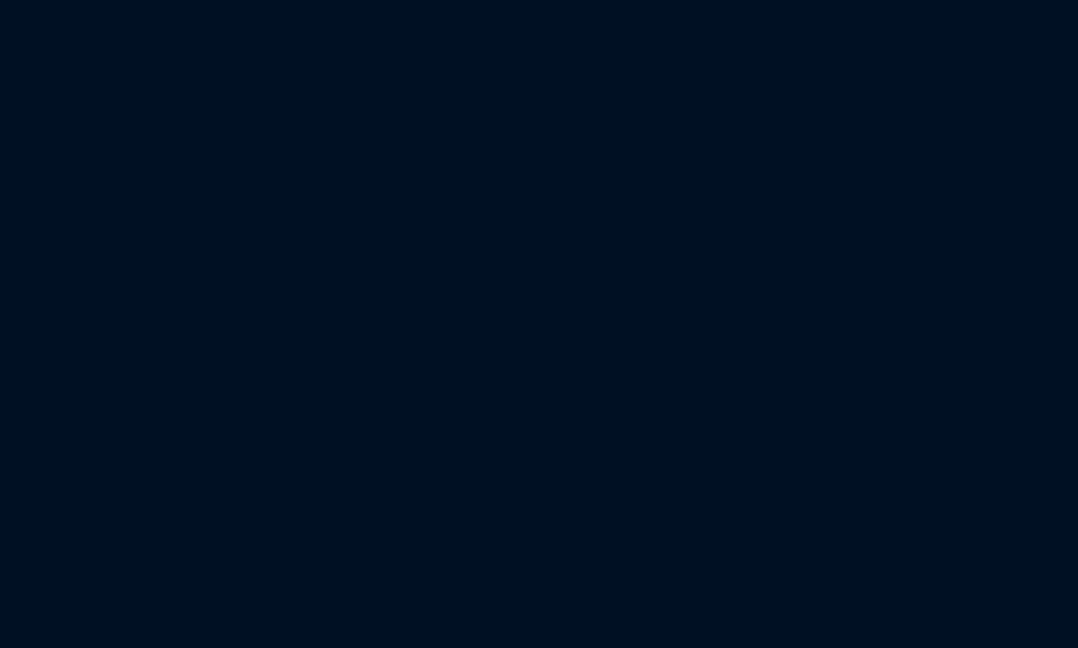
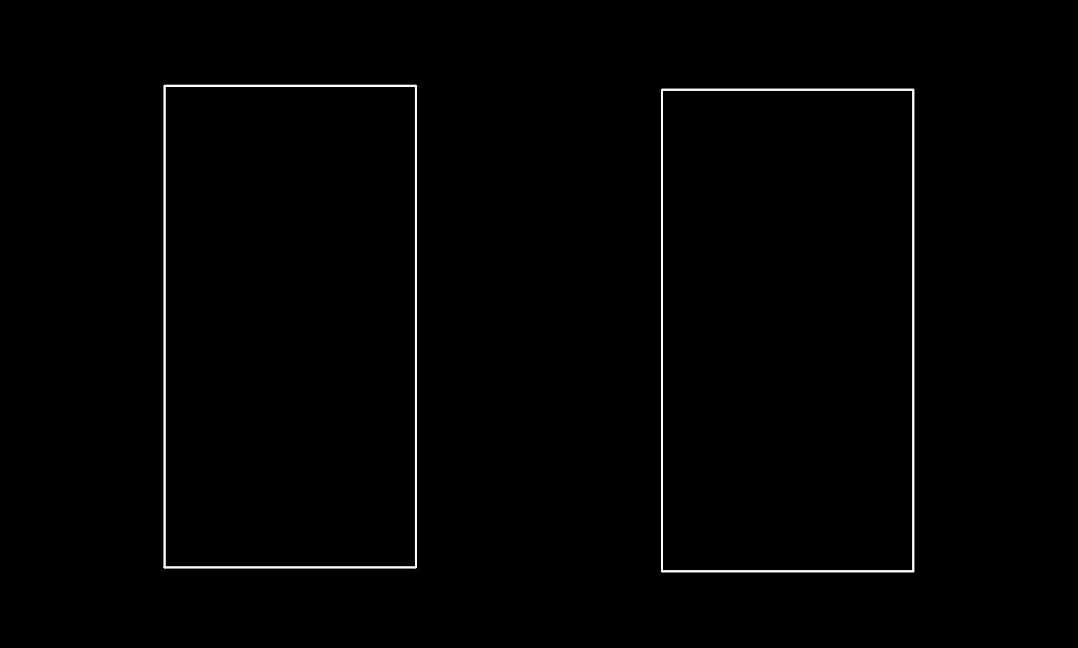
part: none -> (290, 326)
part: none -> (787, 330)

